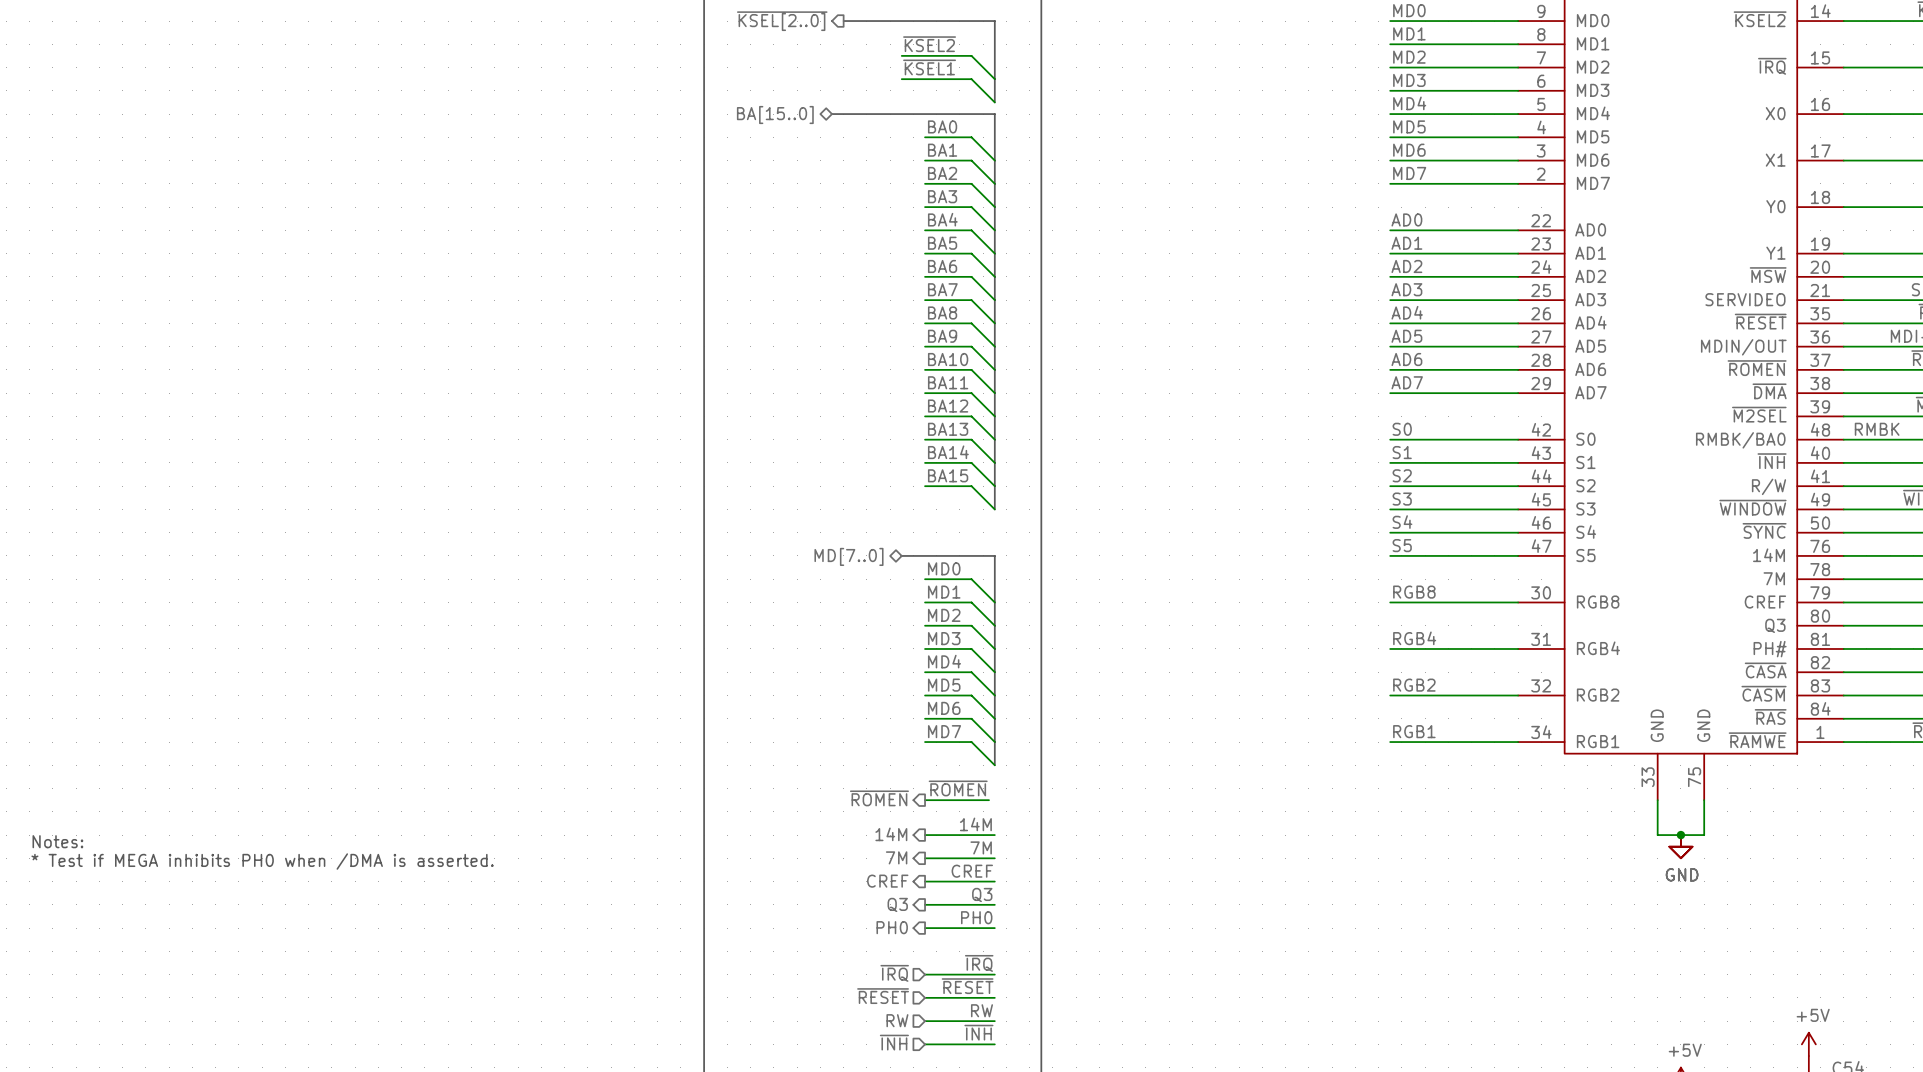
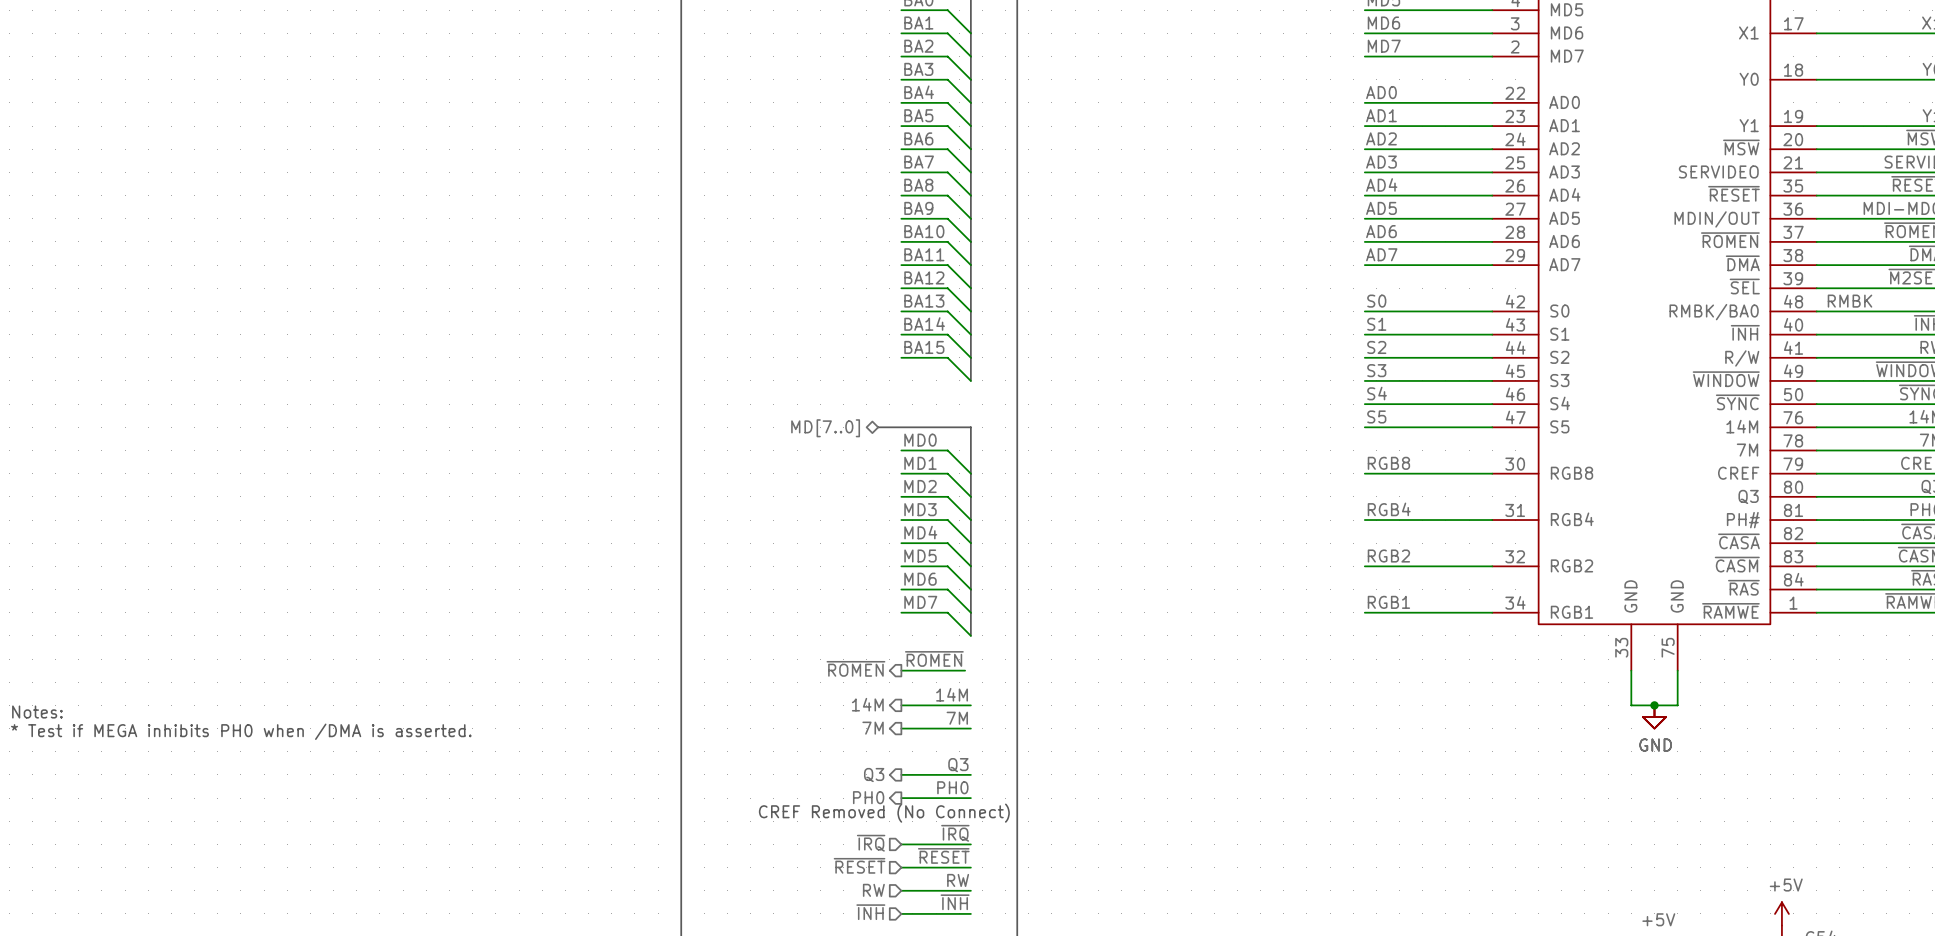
part pin name: ~{M2SEL} (1759, 414) -> ~{SEL} (1744, 286)
label: CREF (972, 871) -> none
hierarchical label: CREF (887, 881) -> none
wire: (925, 881) (994, 881) -> none
text: none -> CREF Removed (No Connect) (884, 813)

